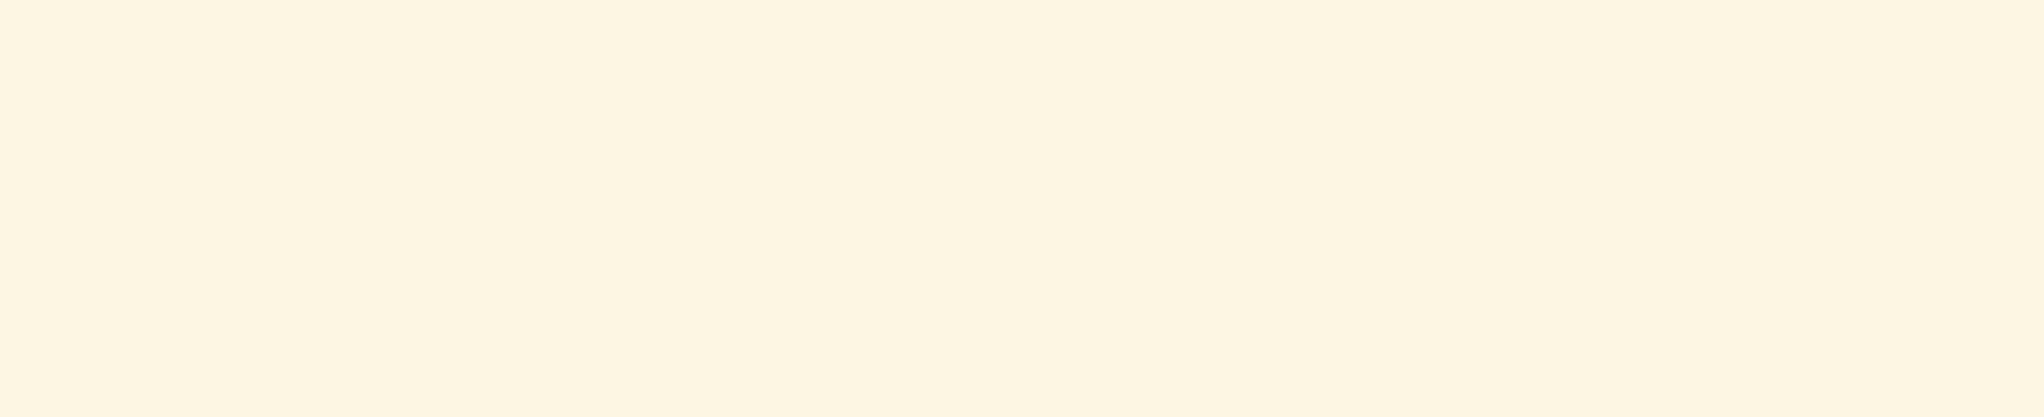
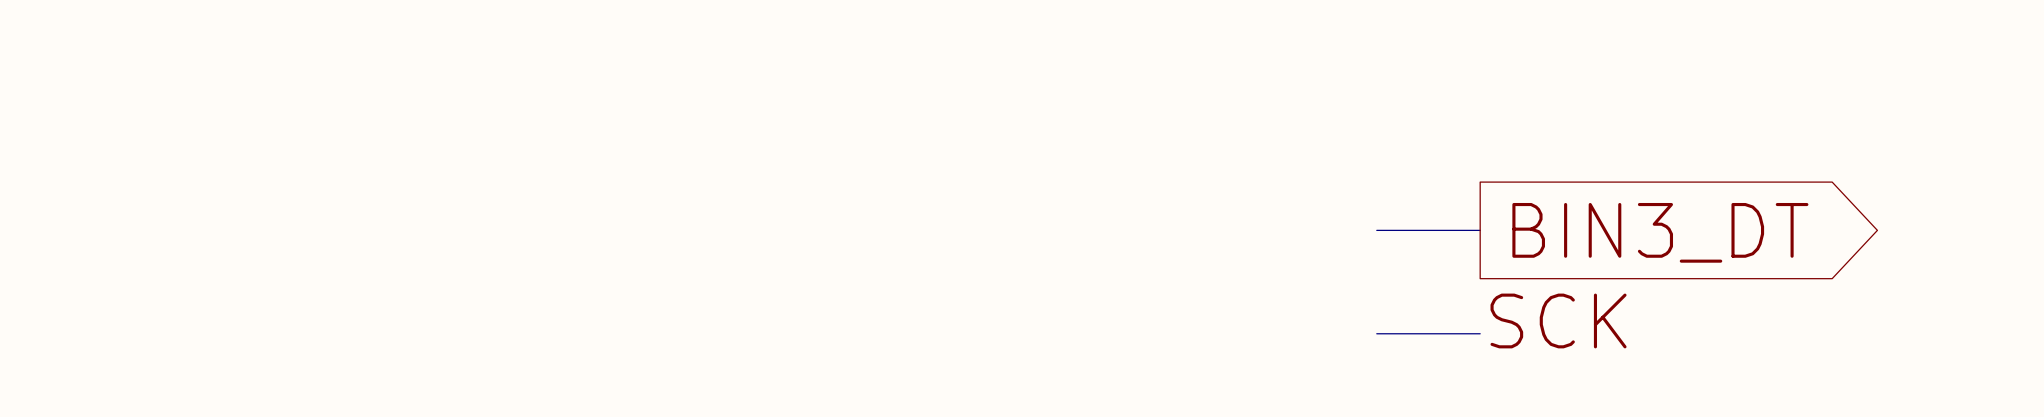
wire: none -> (1376, 230) (1480, 230)
global label: none -> BIN3_DT (1660, 232)
label: none -> SCK (1558, 320)
wire: none -> (1376, 333) (1480, 333)

